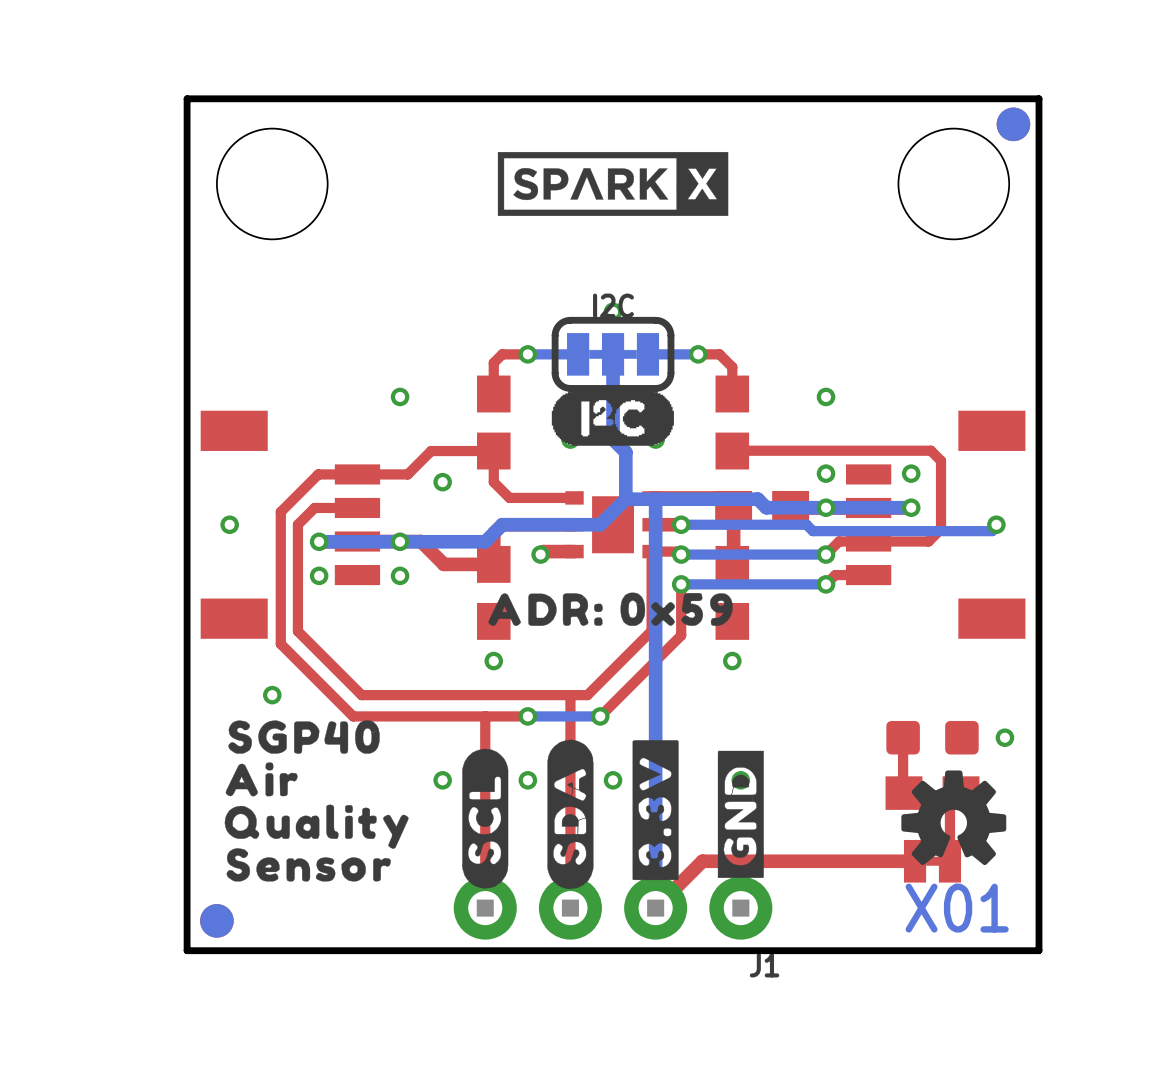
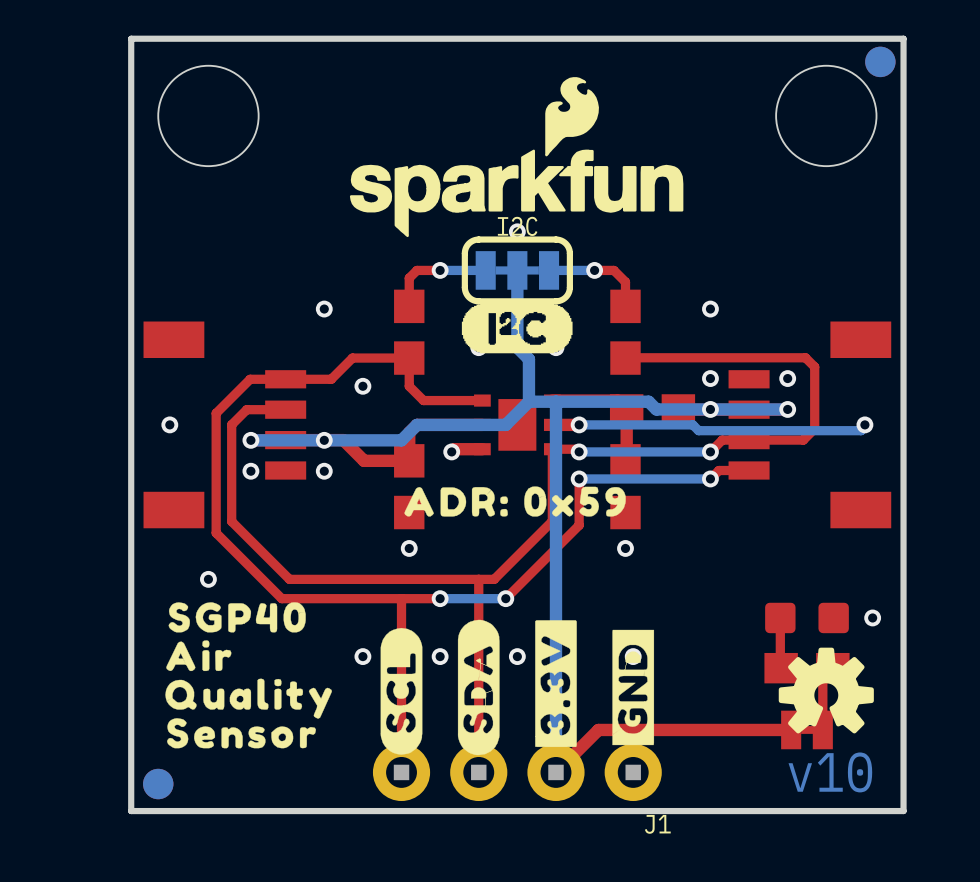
drawing: none -> [349, 77, 684, 238]
drawing: [497, 151, 729, 216] -> none
text: X01 (957, 908) -> v10 (830, 772)

